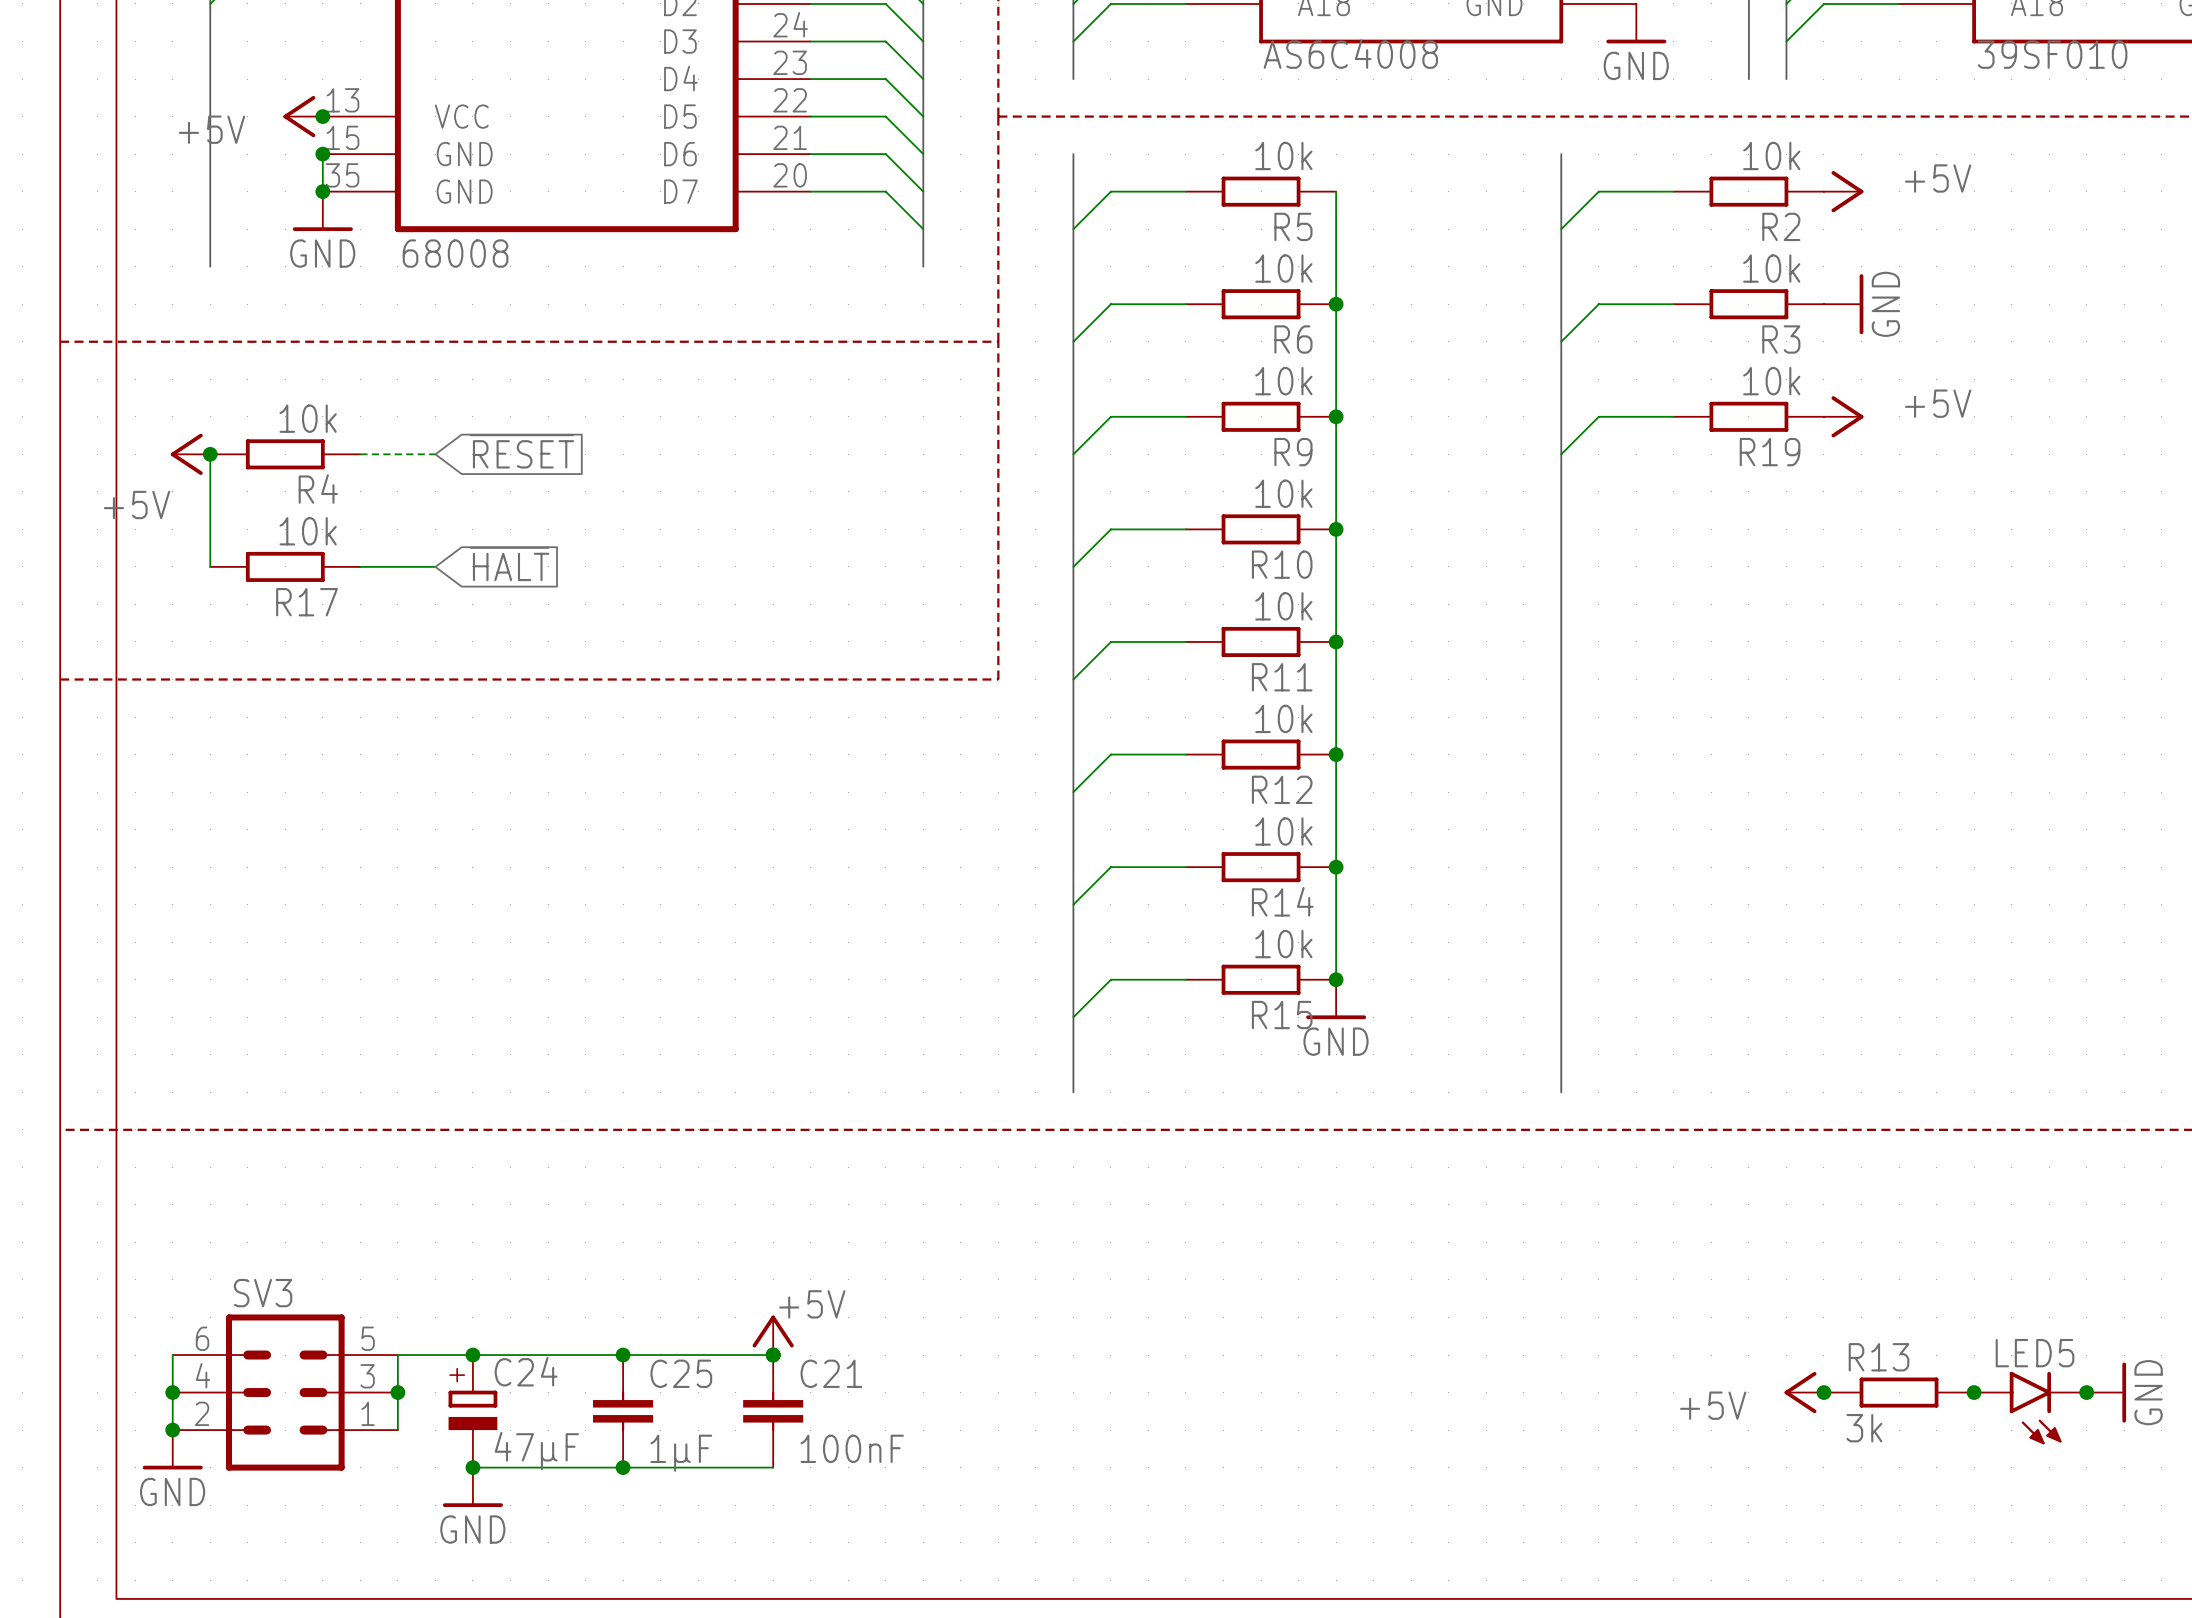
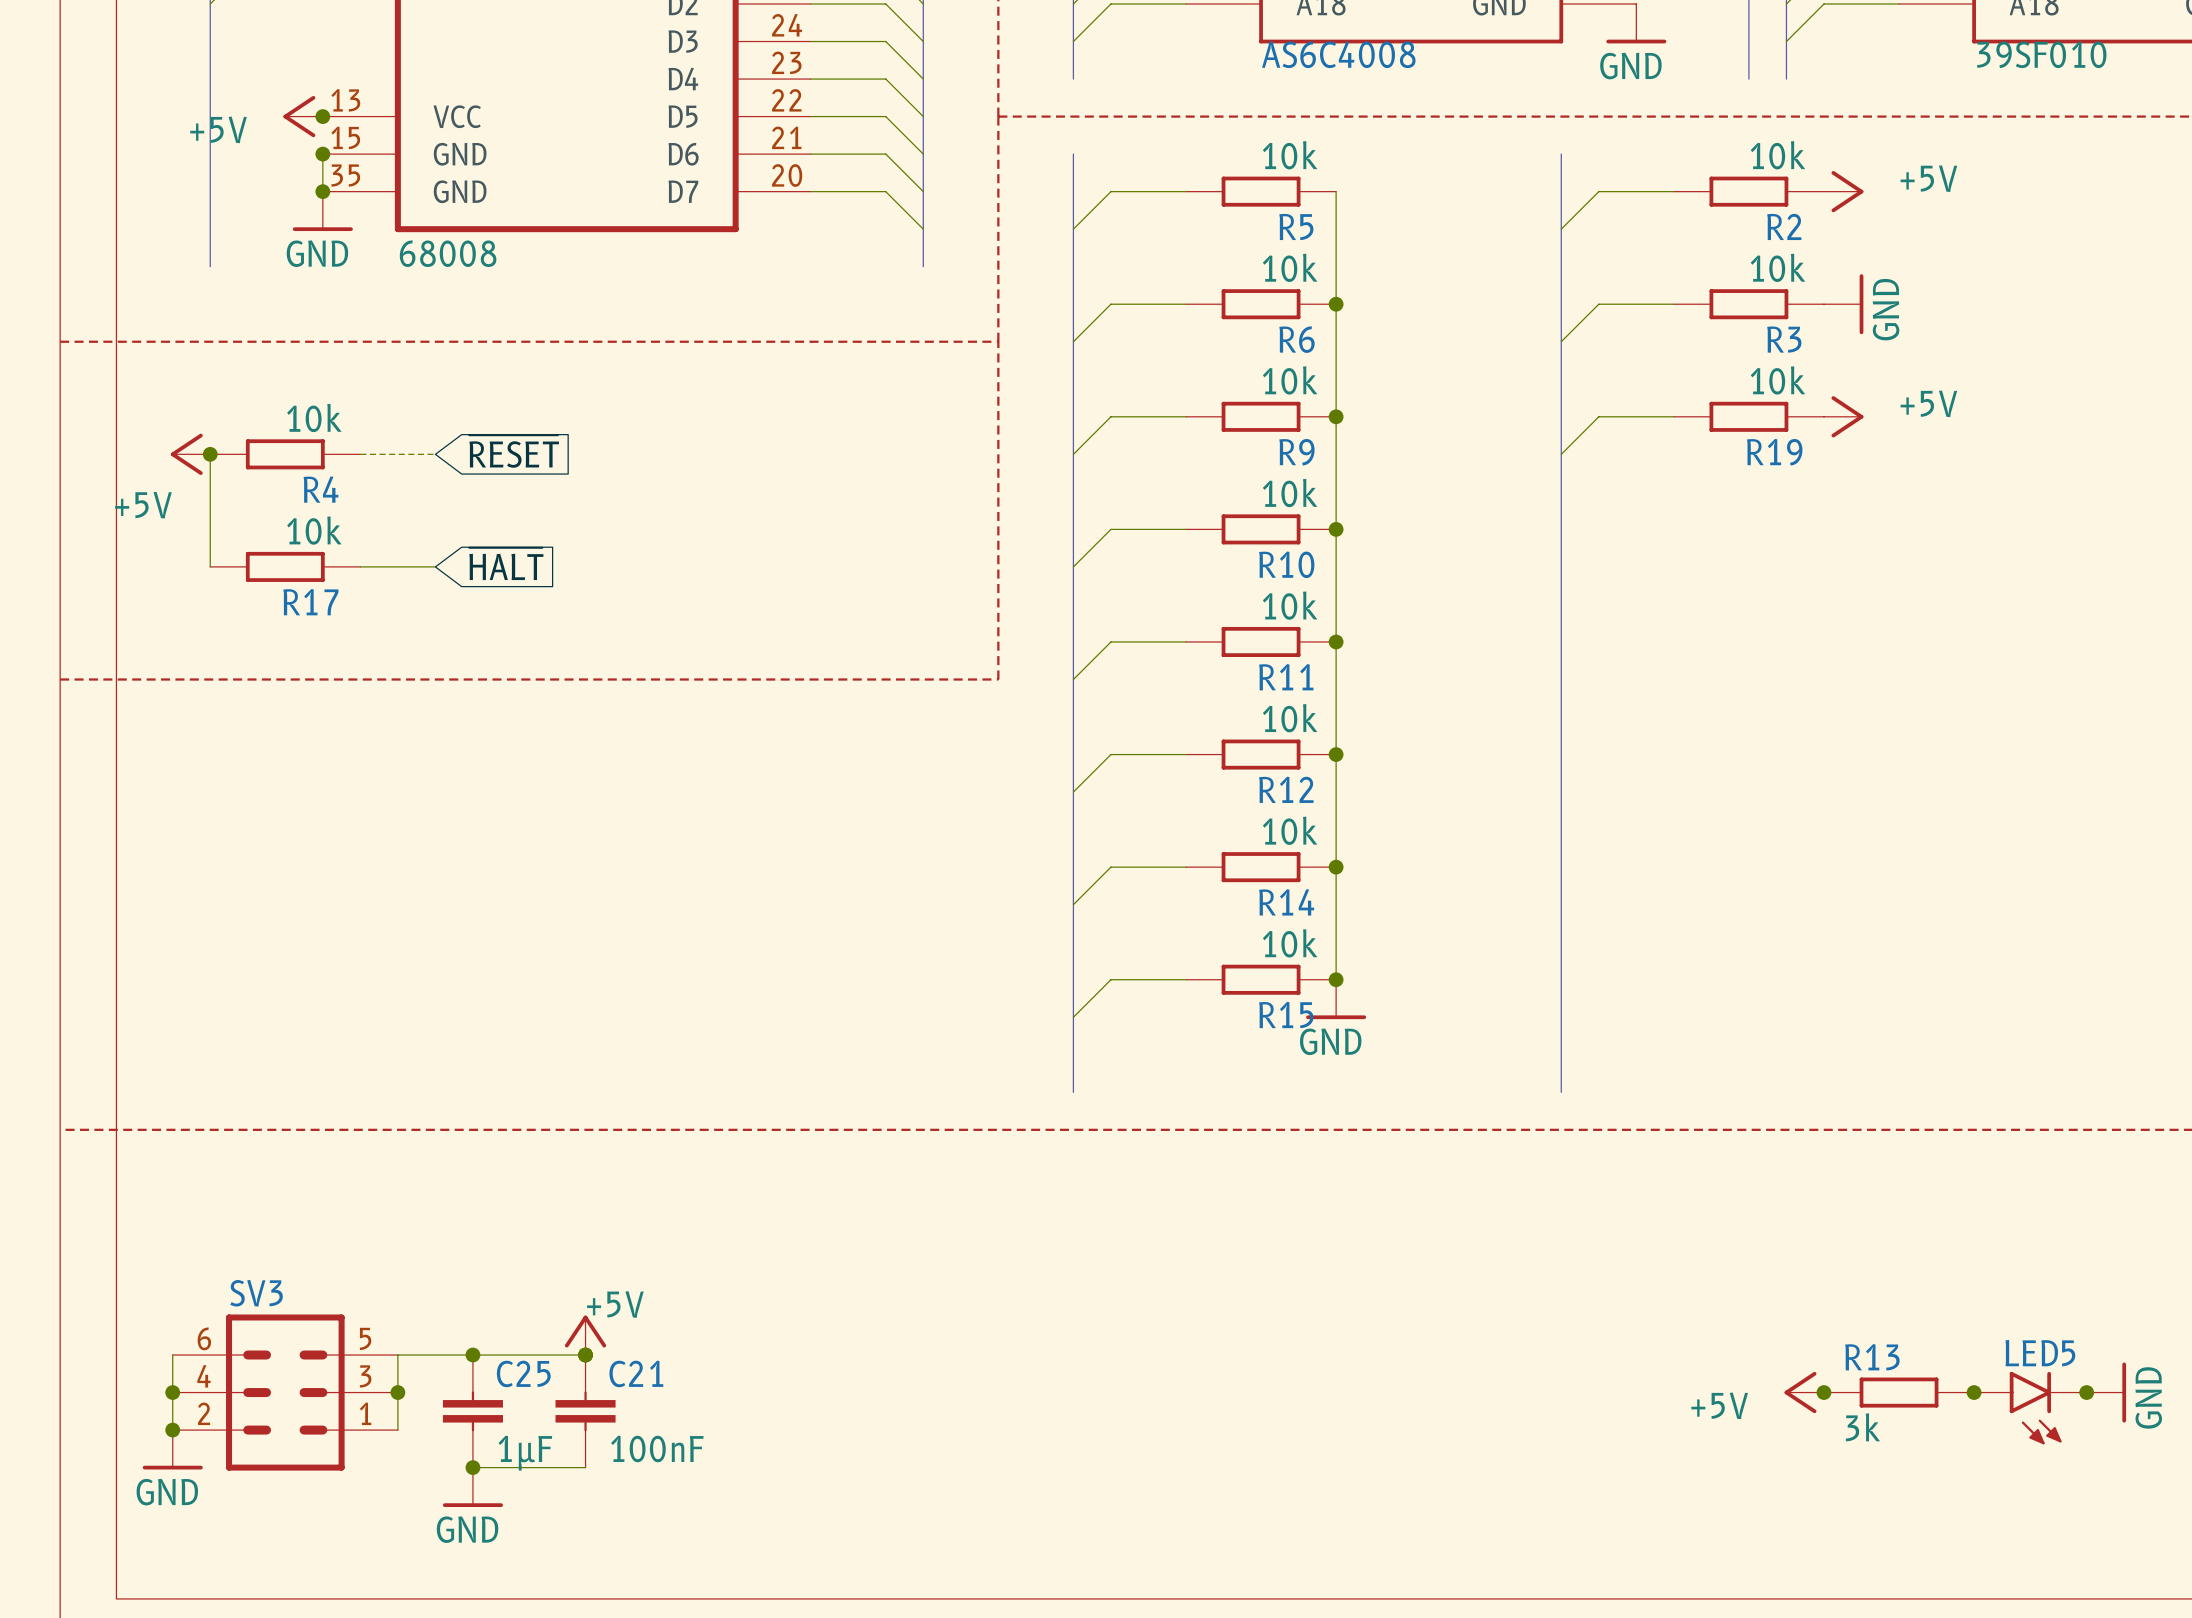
power symbol position: +5V (773, 1335) -> +5V (585, 1335)
wire: (585, 1355) (773, 1355) -> none
junction position: (623, 1355) -> (585, 1355)
junction: (773, 1355) -> none
C24: 47µF (472, 1411) -> none
C25 position: (623, 1411) -> (472, 1411)
C21 position: (773, 1411) -> (585, 1411)
wire: (585, 1467) (773, 1467) -> none
junction: (623, 1467) -> none

